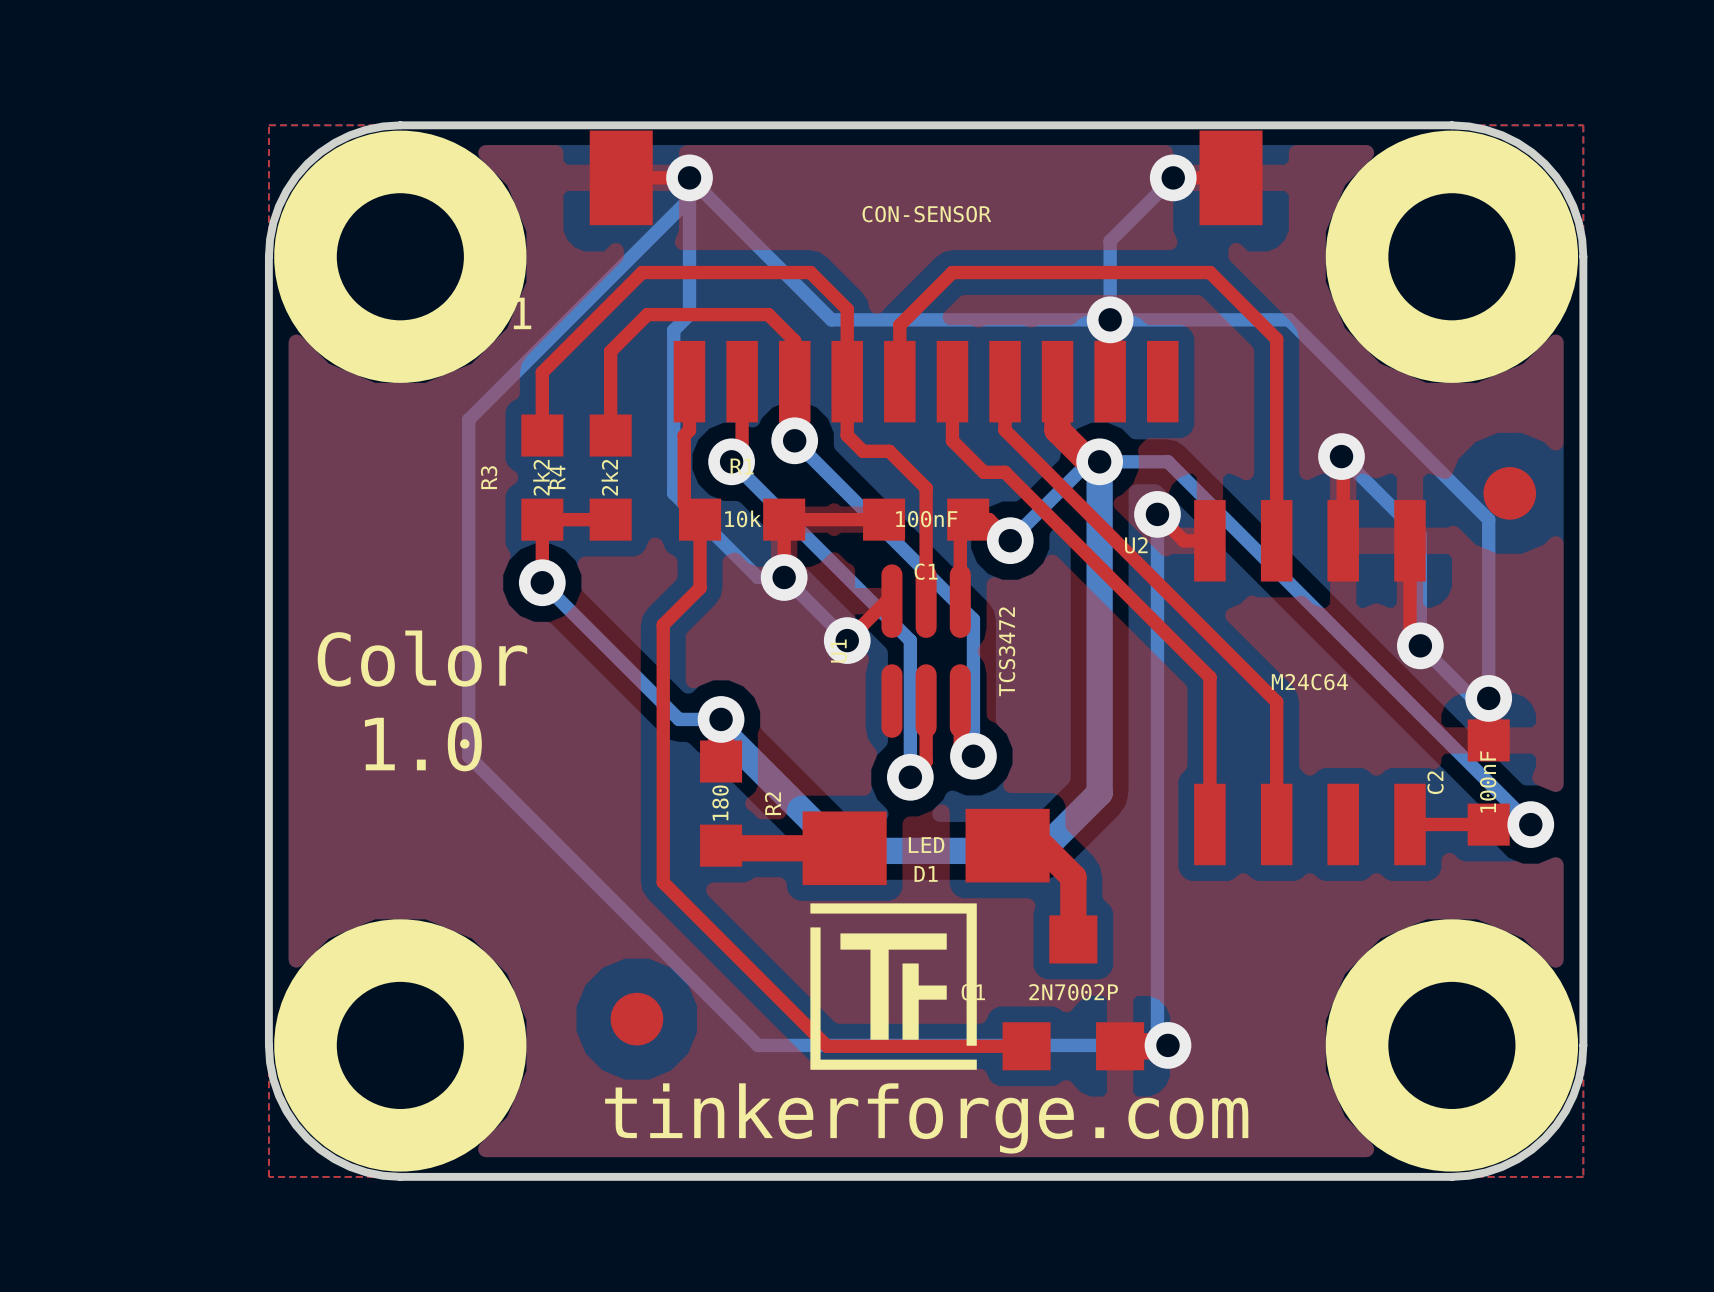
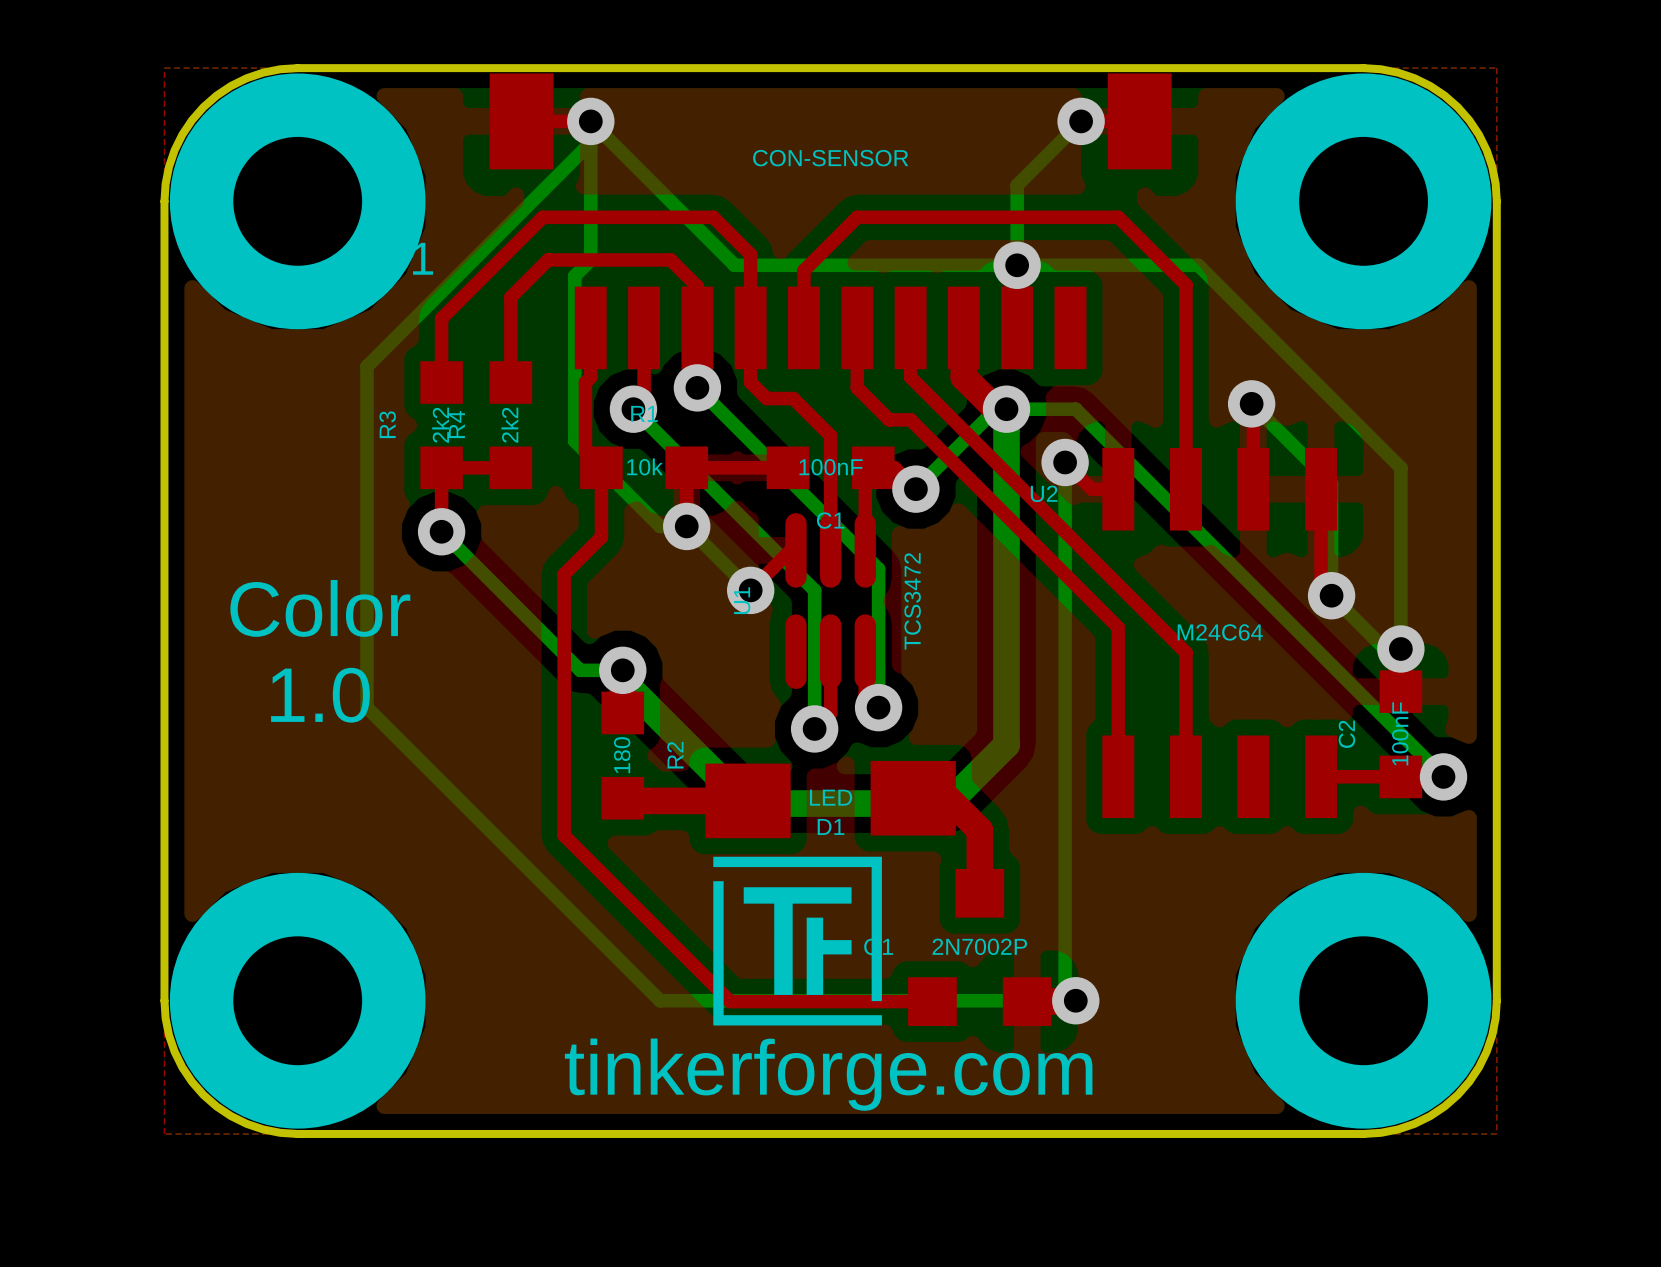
part: (1509, 493) -> none
part: (636, 1019) -> none

